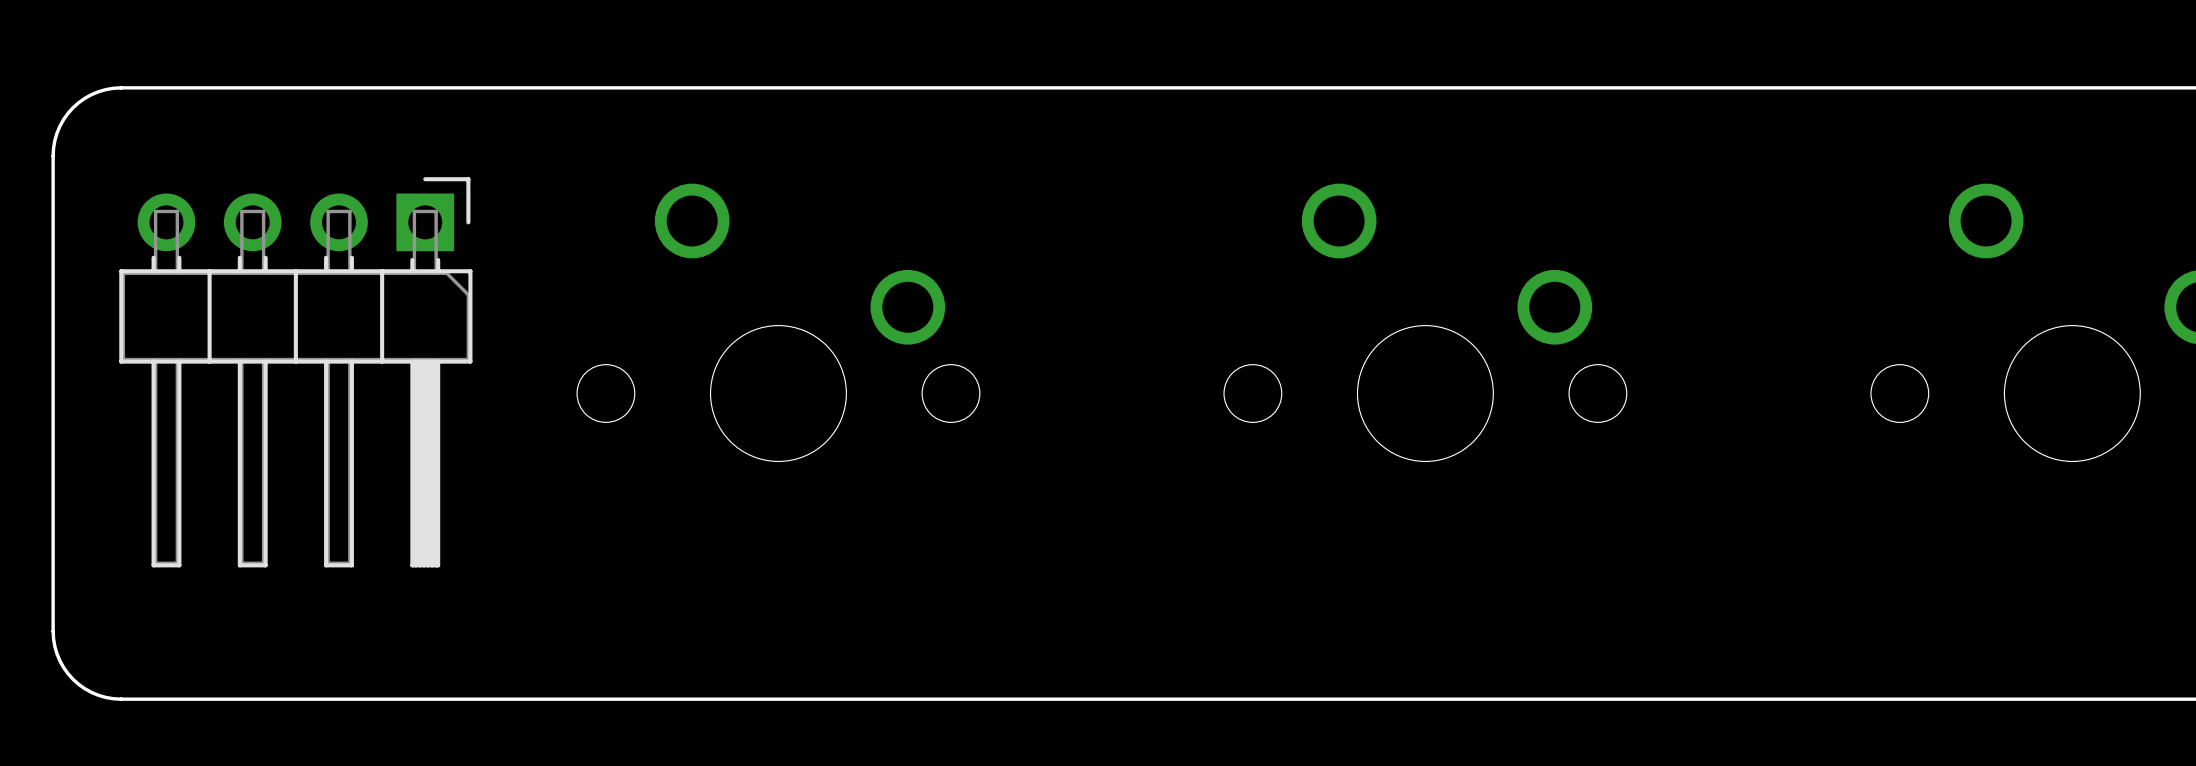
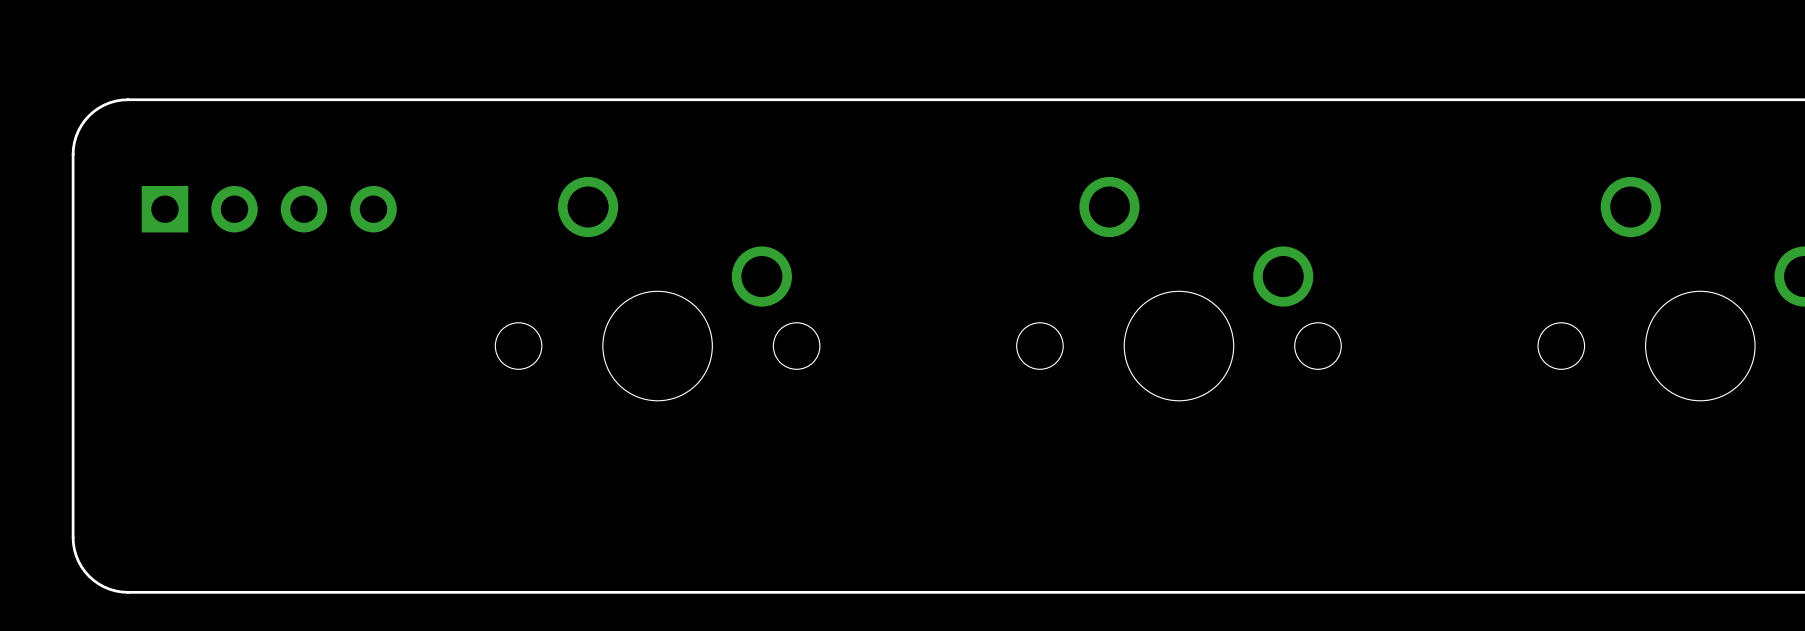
part: none -> (269, 209)
part: (295, 372) -> none

